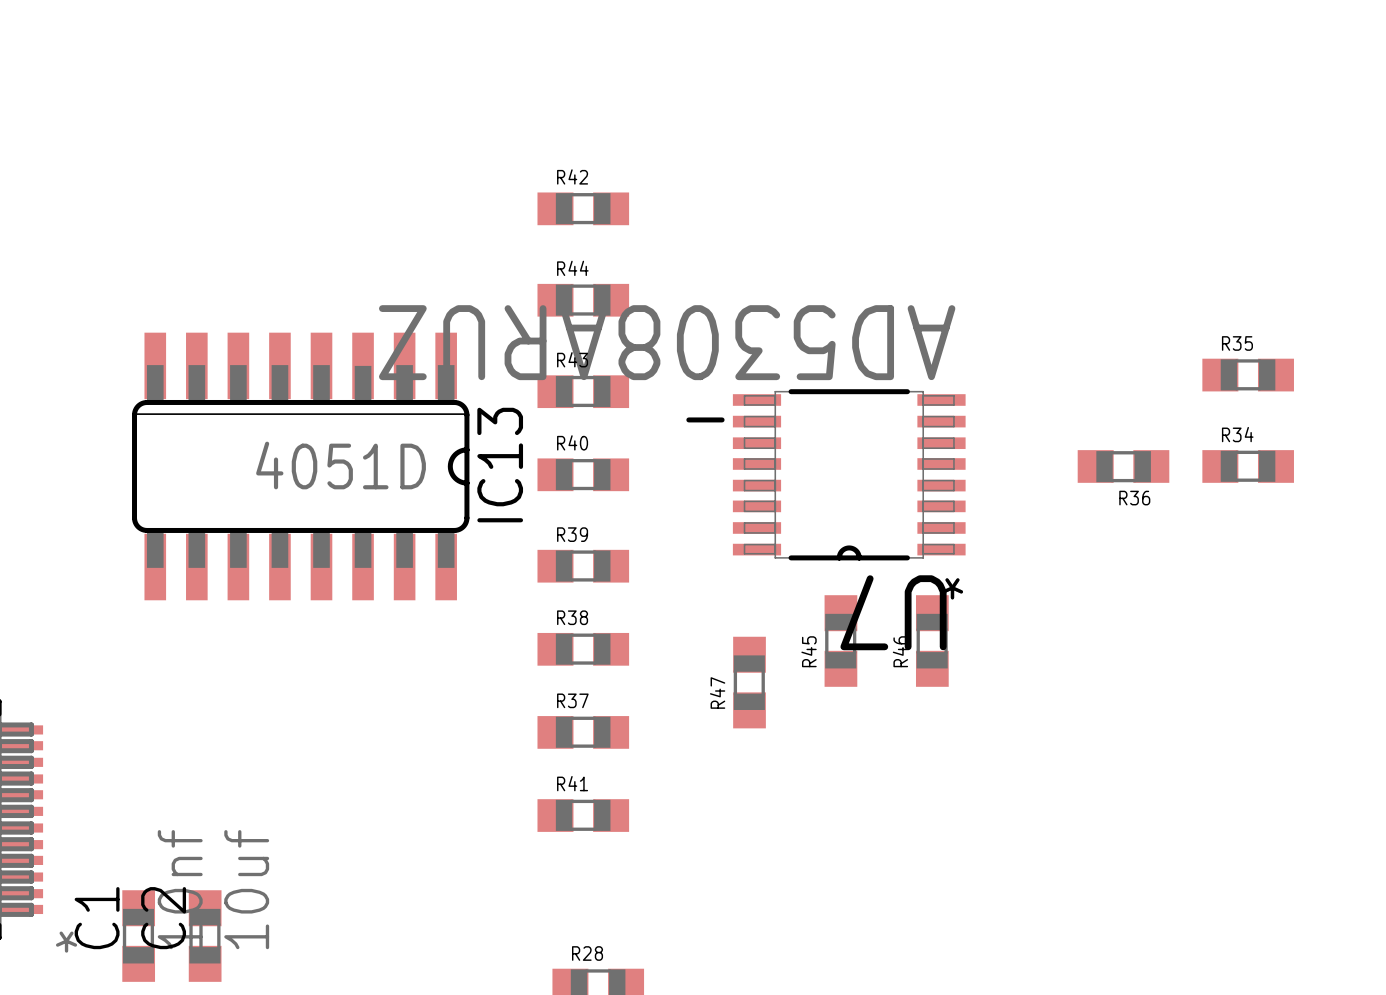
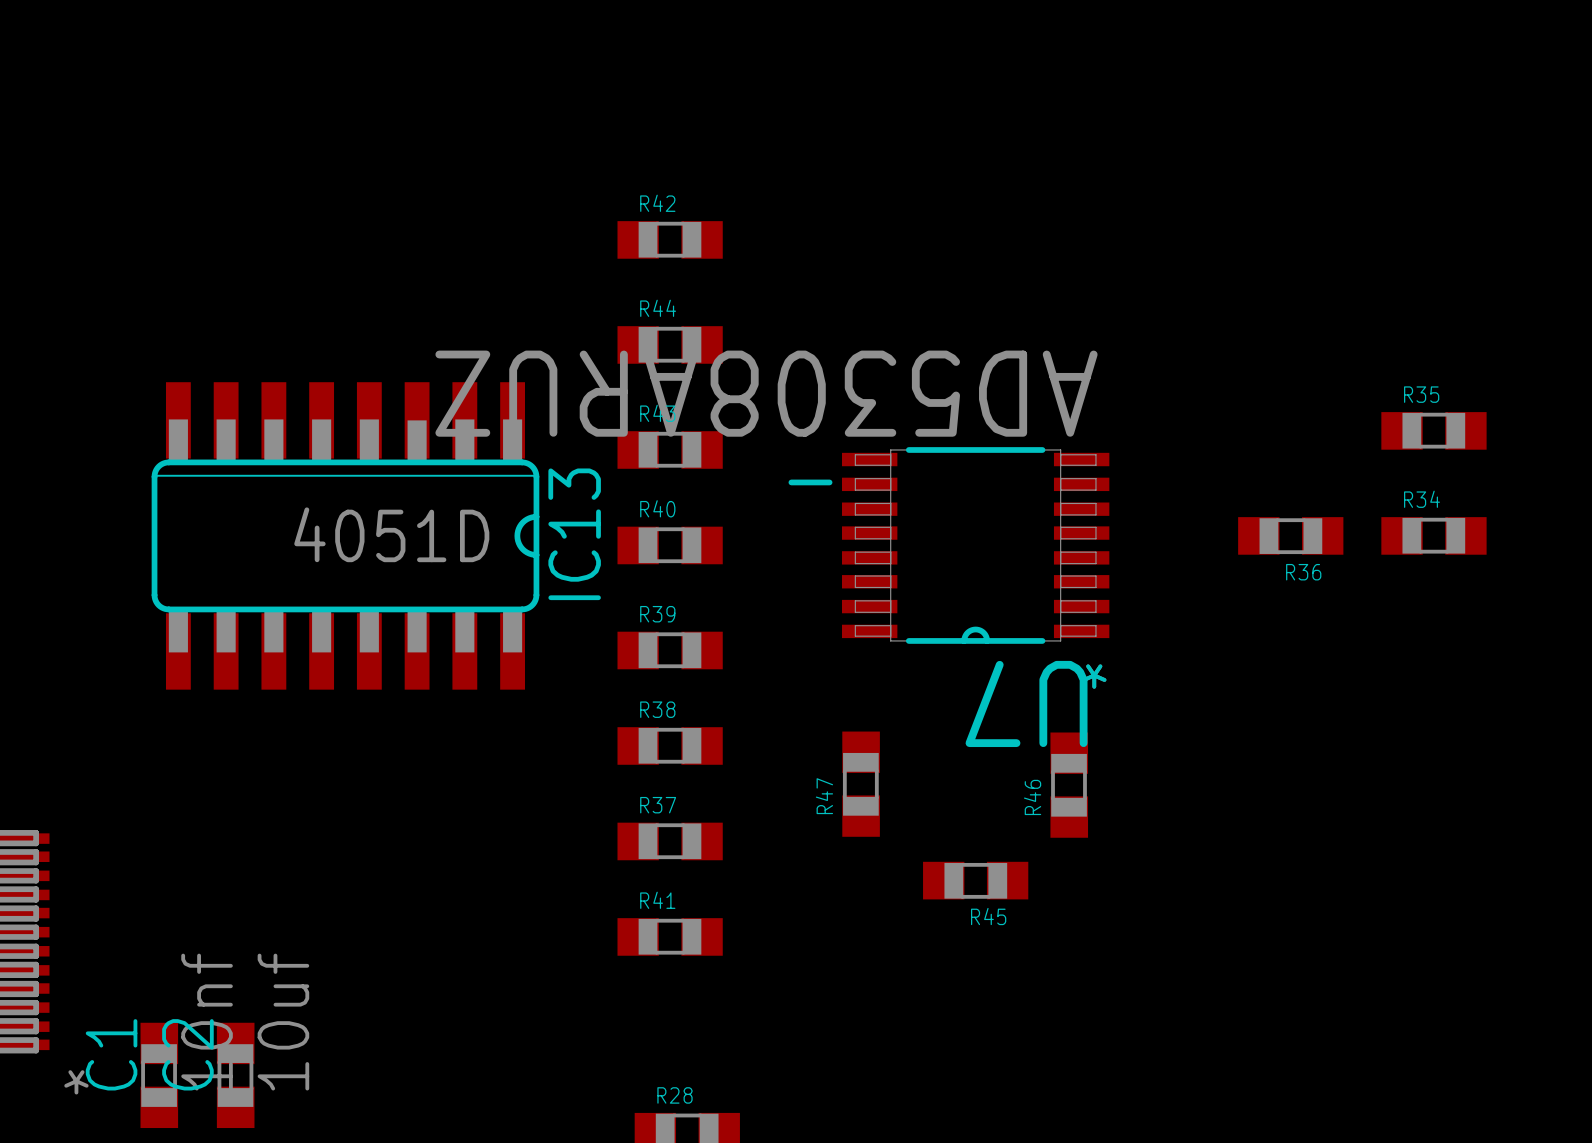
R45 rotation: 0° (840, 641) -> 90° clockwise (975, 880)
R45 position: (840, 641) -> (975, 880)
R46 position: (932, 641) -> (1069, 785)

